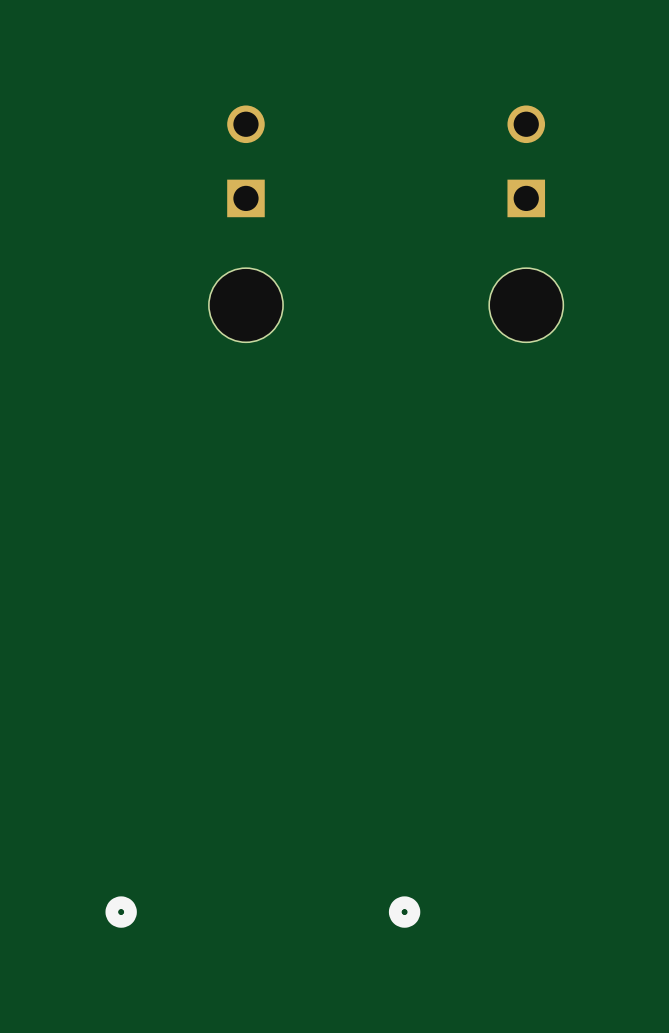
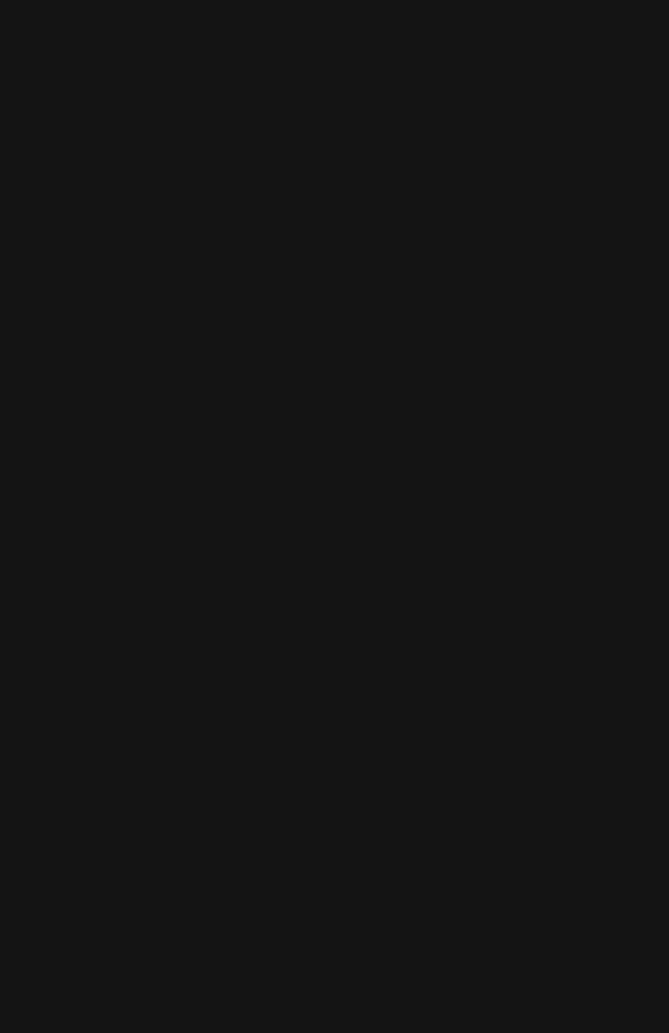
part: (245, 223) -> none
part: (526, 223) -> none
part: (121, 912) -> none
part: (404, 912) -> none

